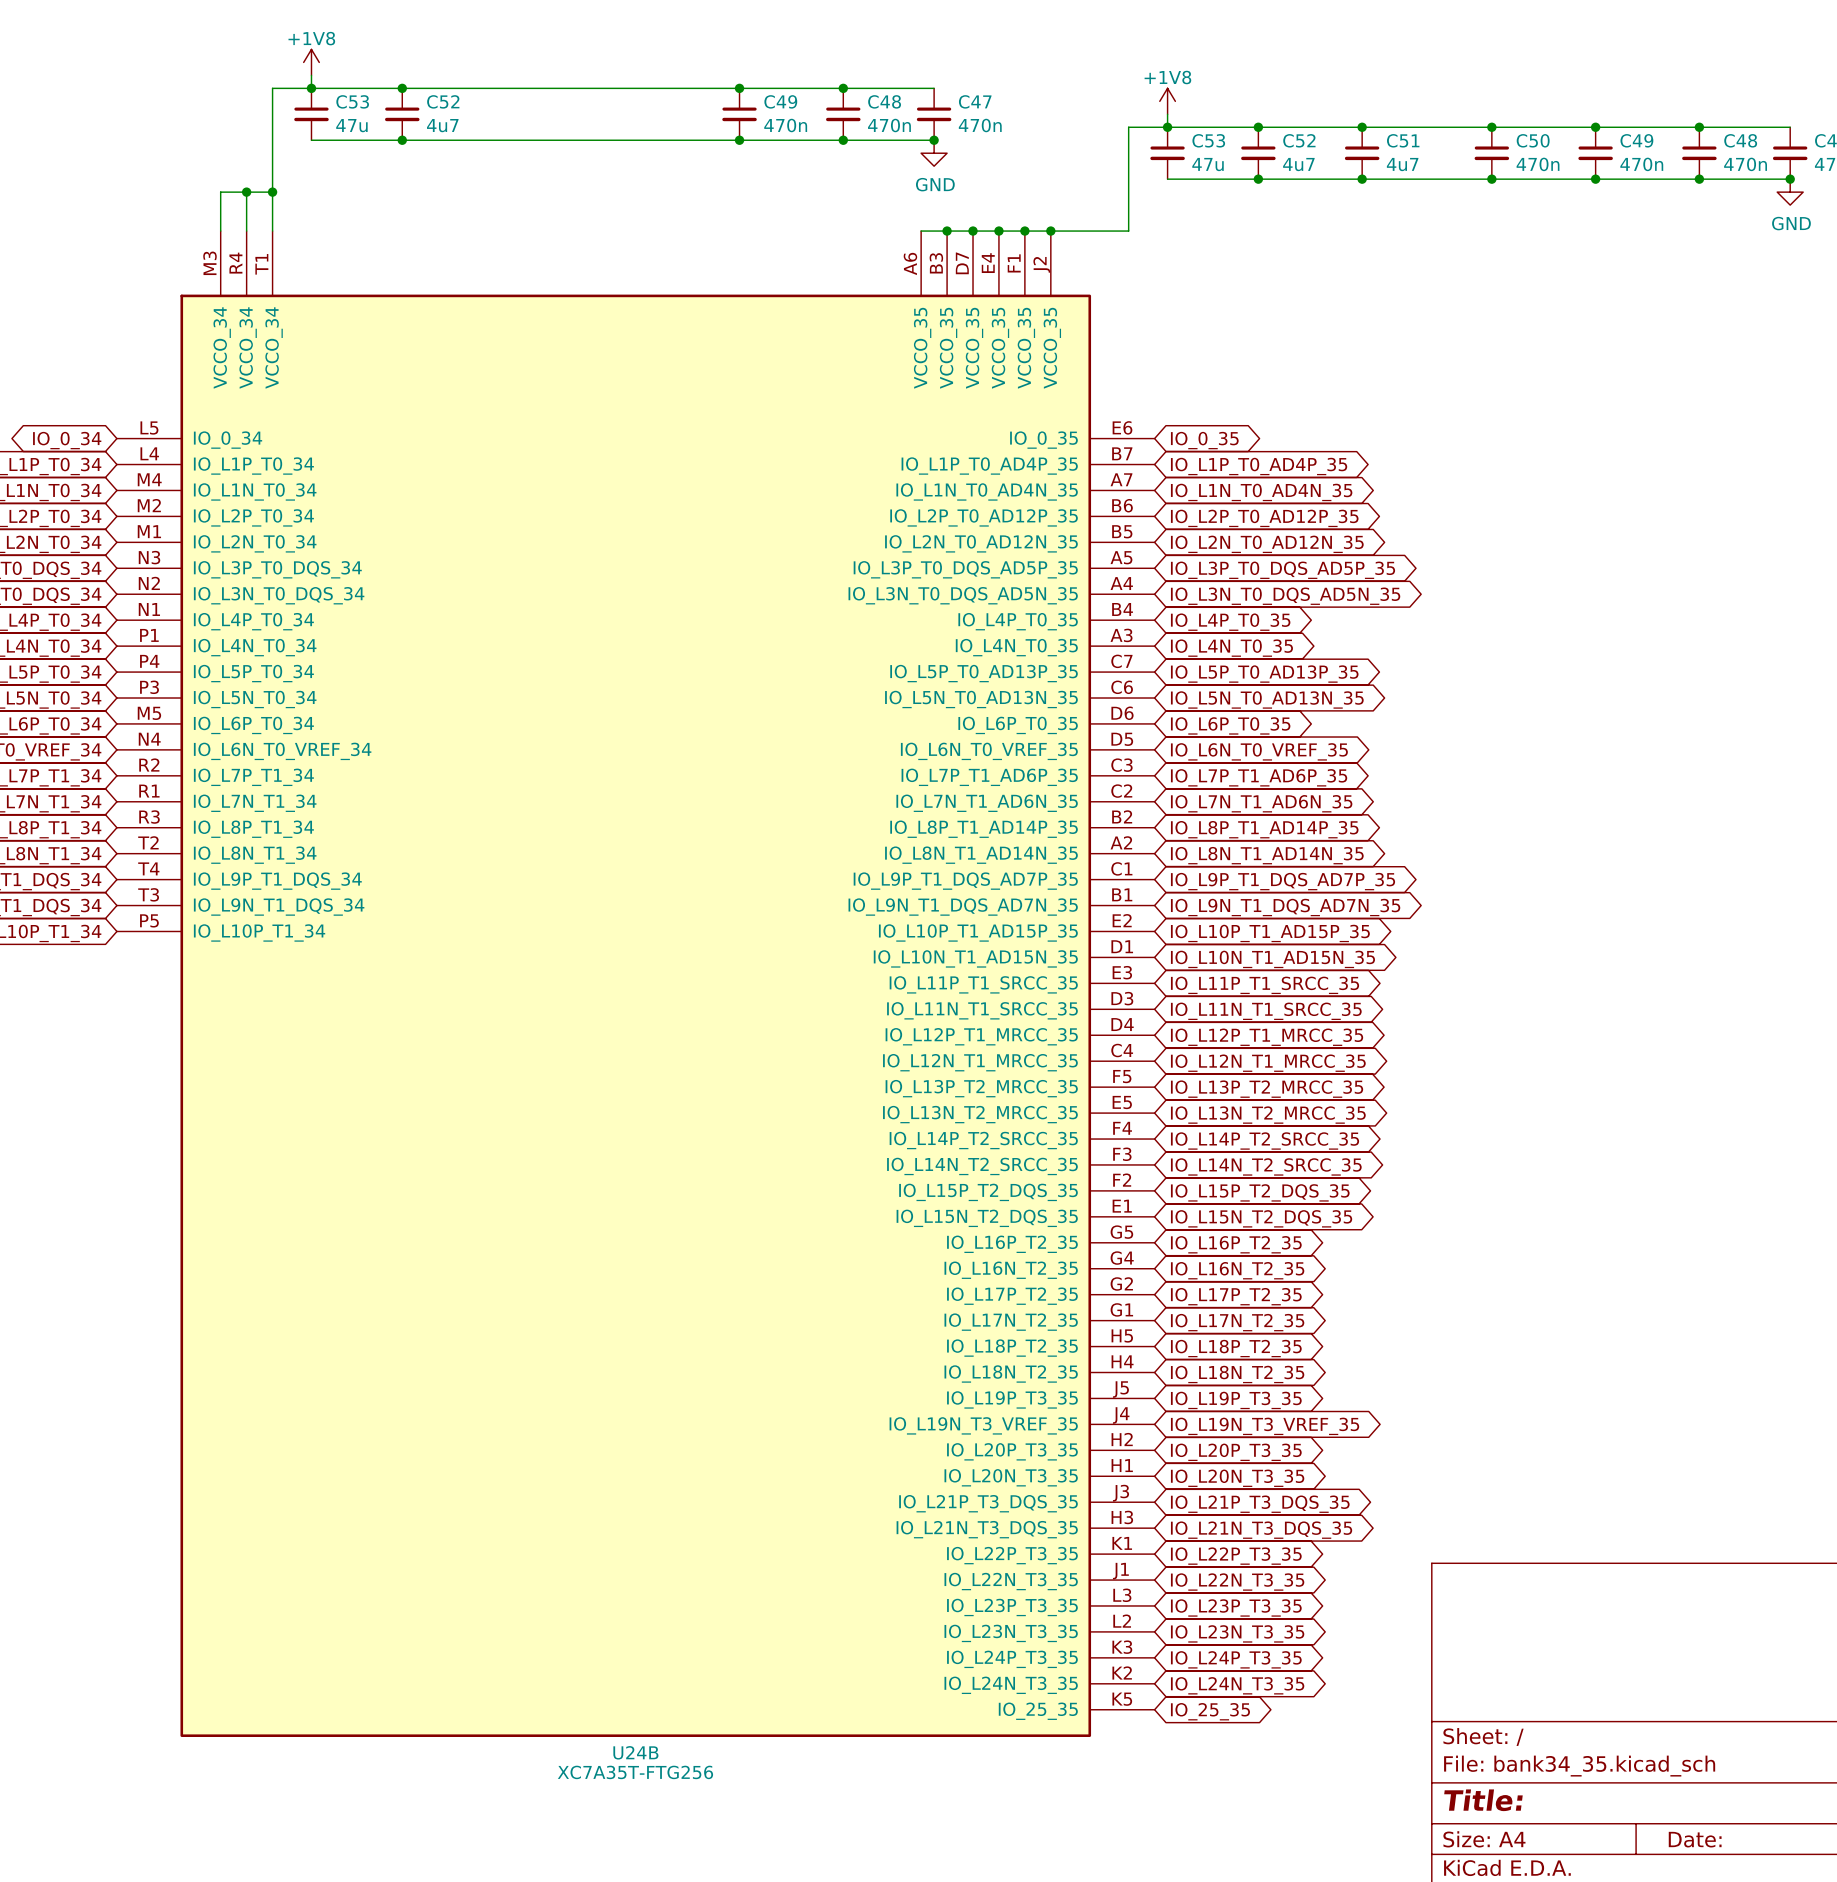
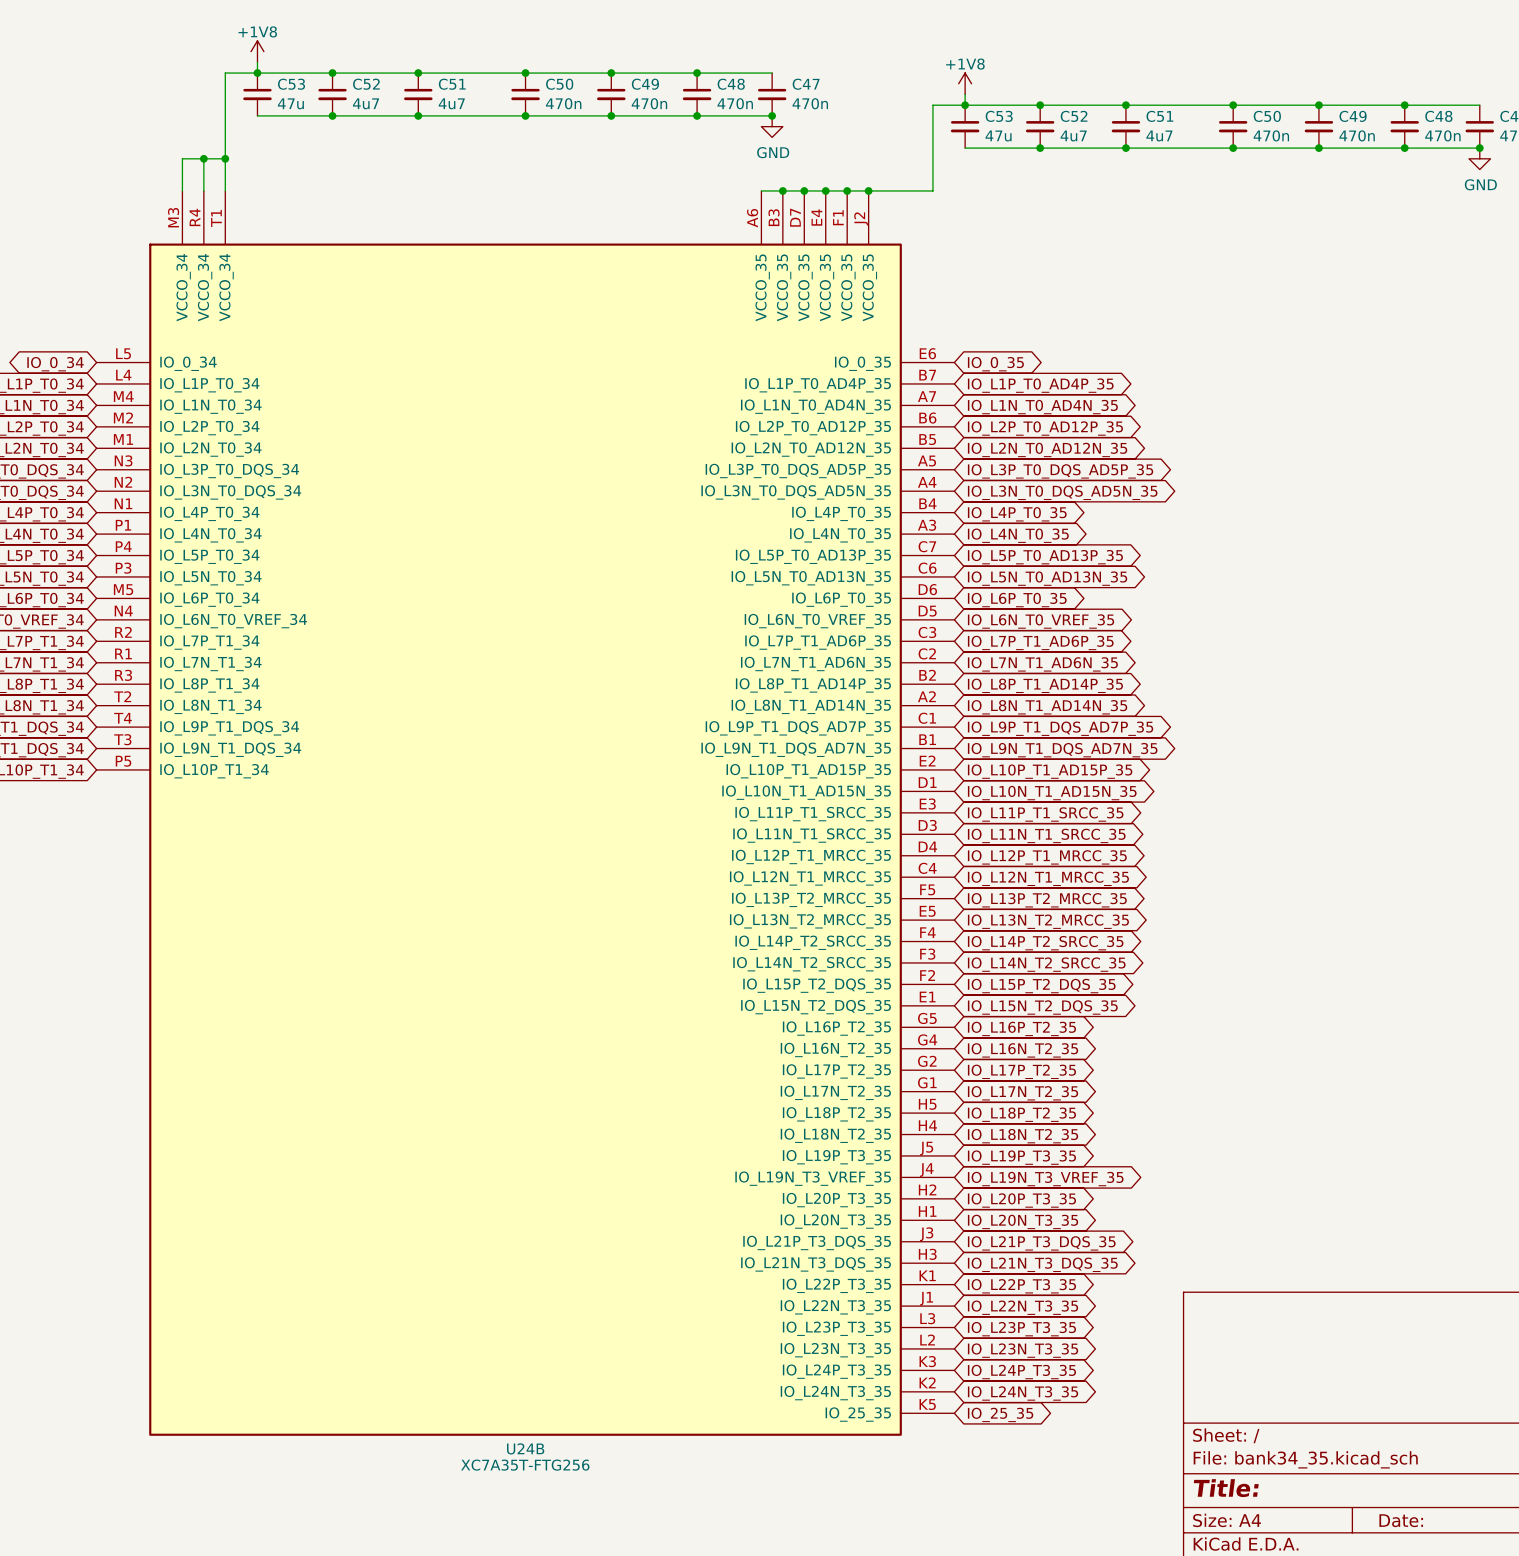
junction: none -> (418, 73)
junction: none -> (525, 73)
C51: none -> 4u7 (418, 94)
C50: none -> 470n (525, 94)
junction: none -> (418, 115)
junction: none -> (525, 115)

